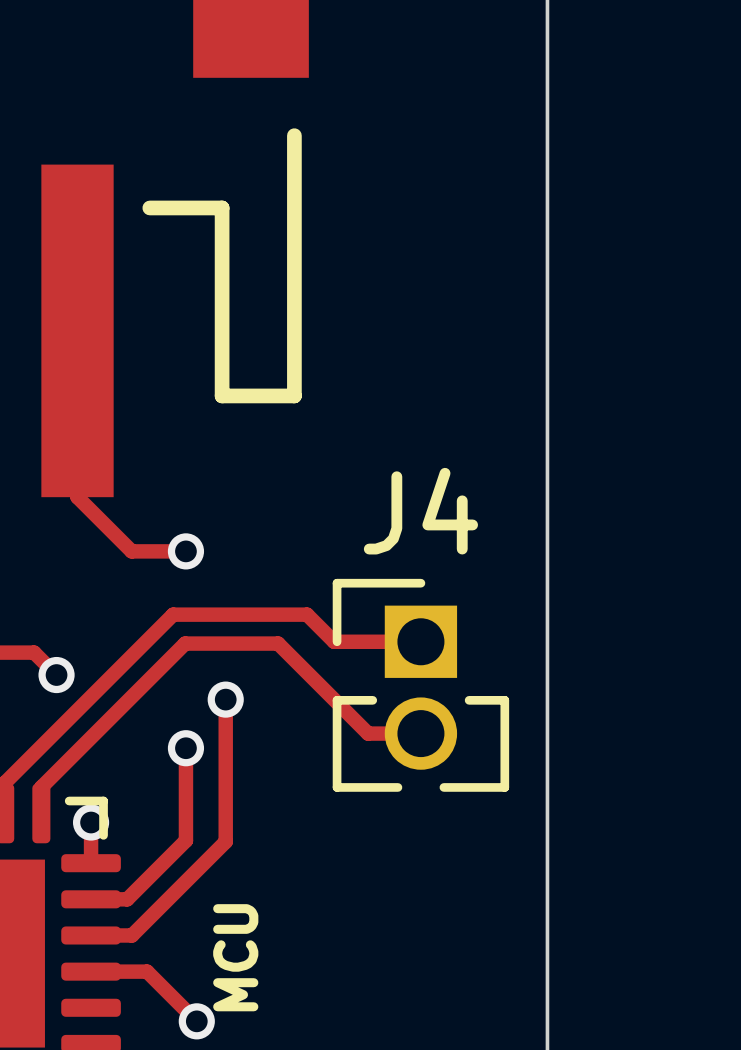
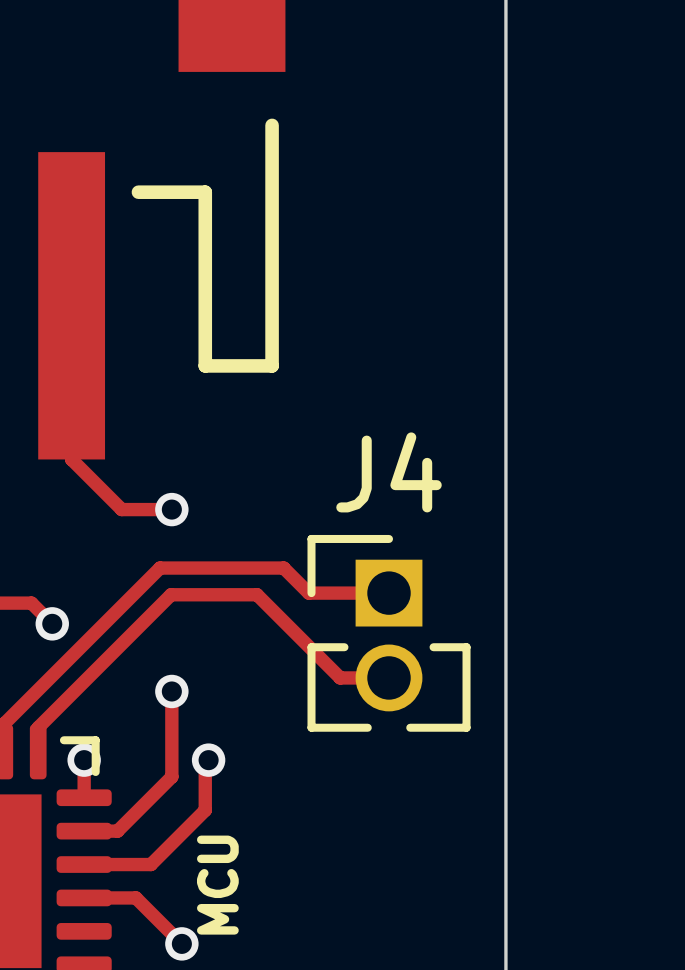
track: (225, 699) (225, 841) (131, 935) -> (208, 760) (205, 763) (205, 810) (150, 864) (121, 864)
via position: (225, 699) -> (208, 760)

